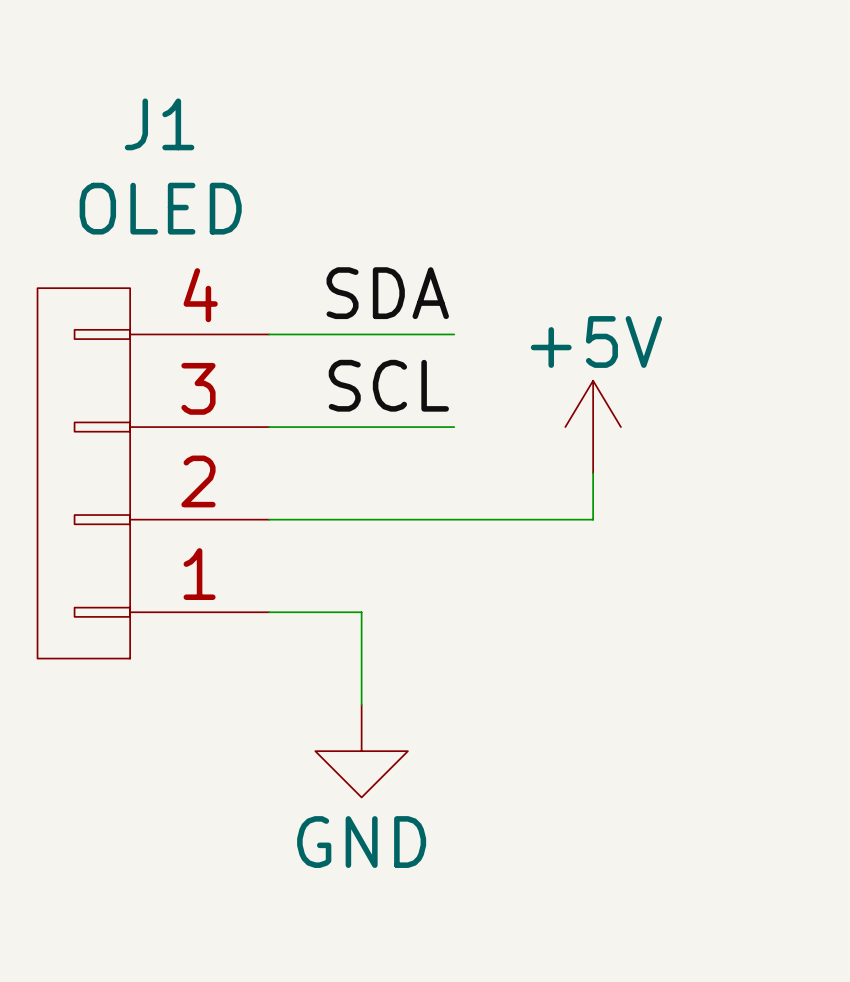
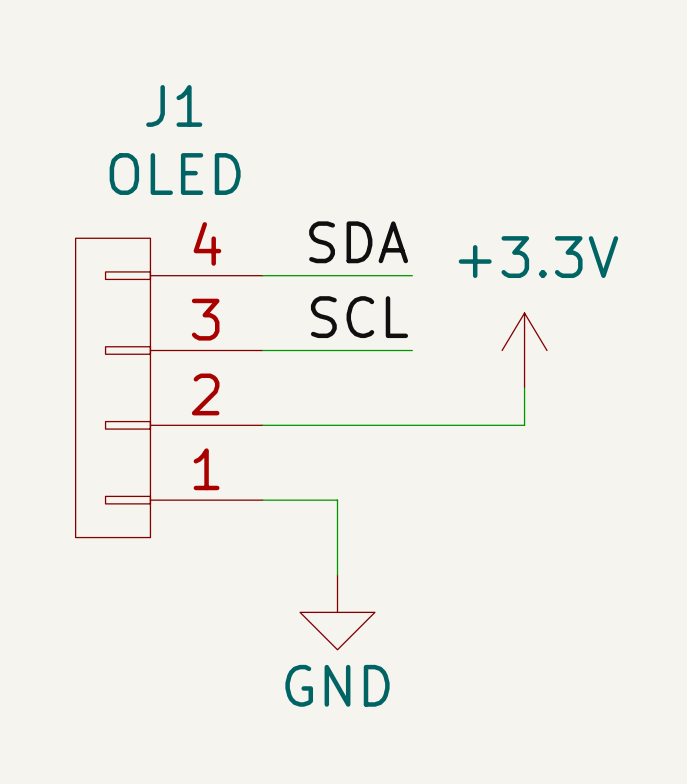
power symbol: +5V (593, 427) -> +3.3V (524, 350)

